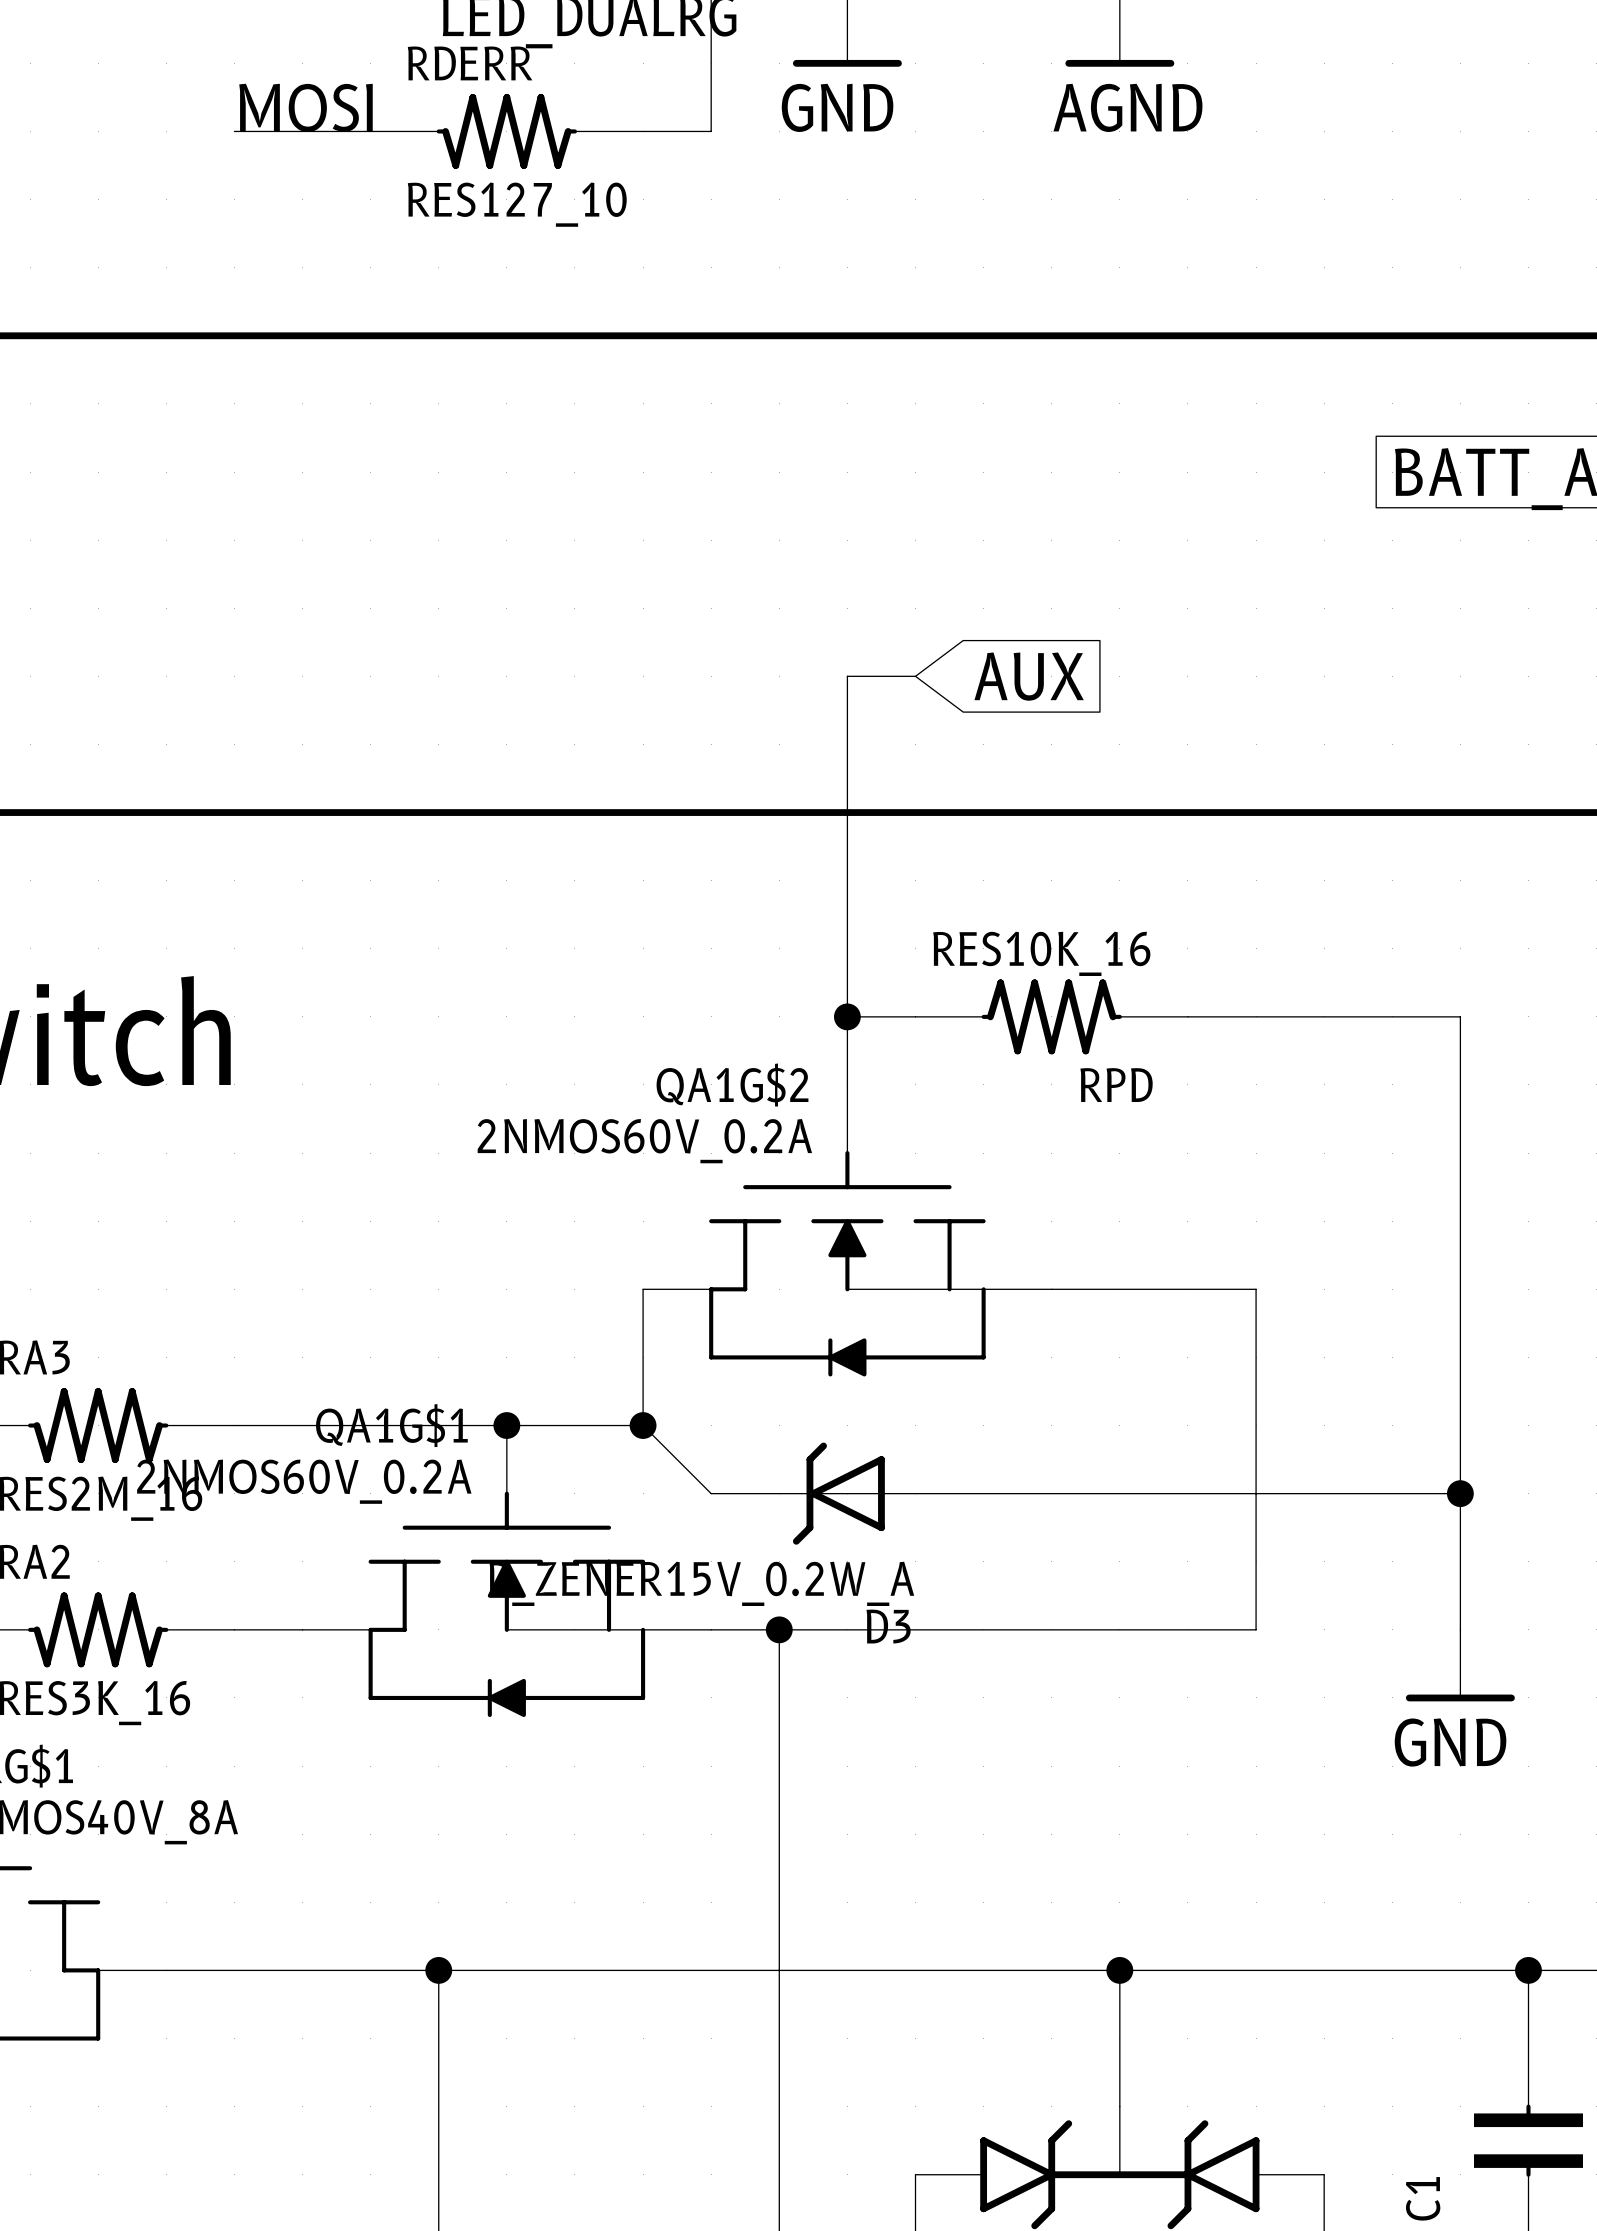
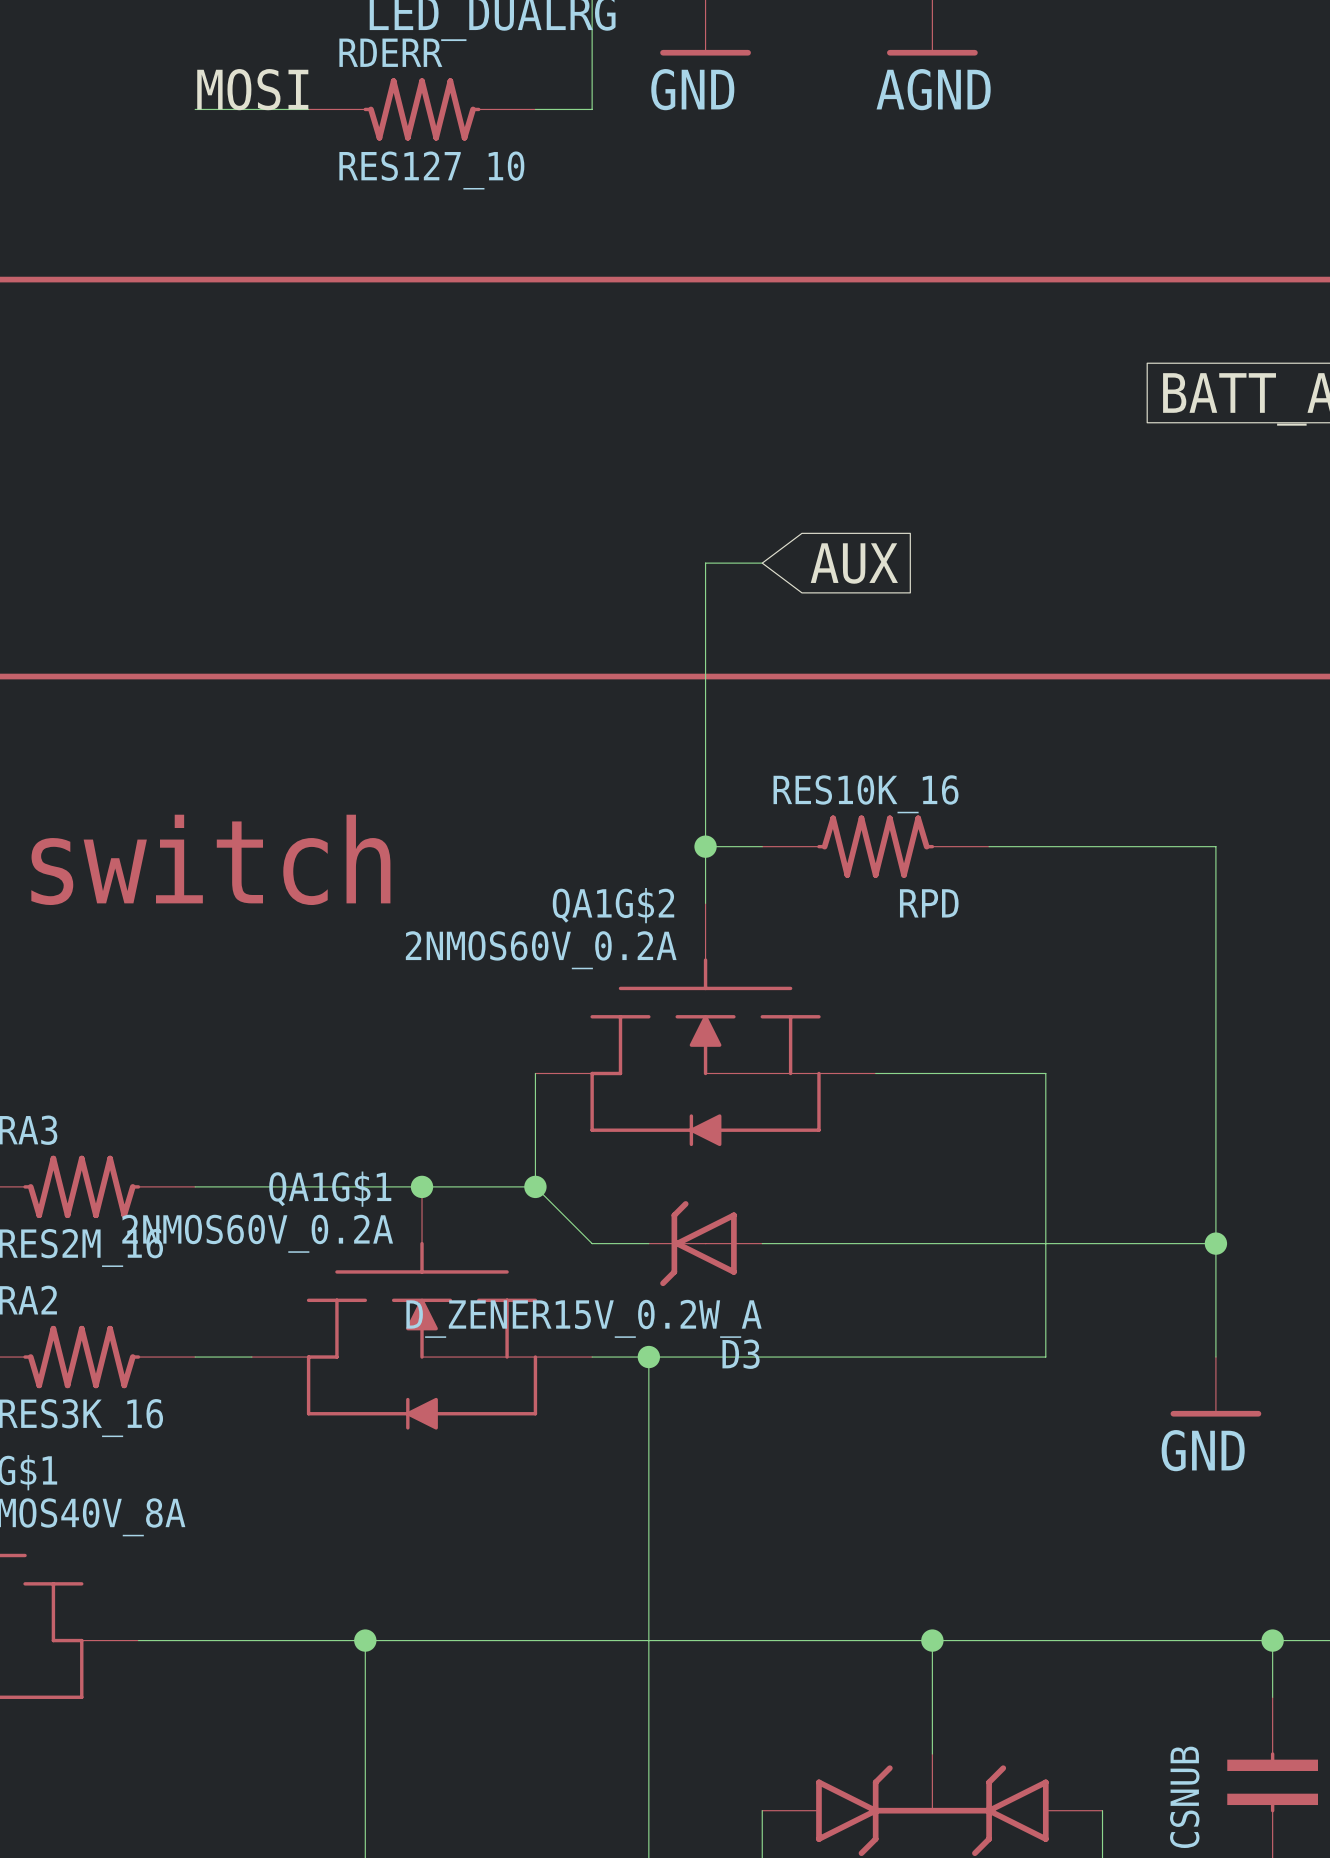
C1 name: C1 (1423, 2198) -> CSNUB (1184, 1797)

